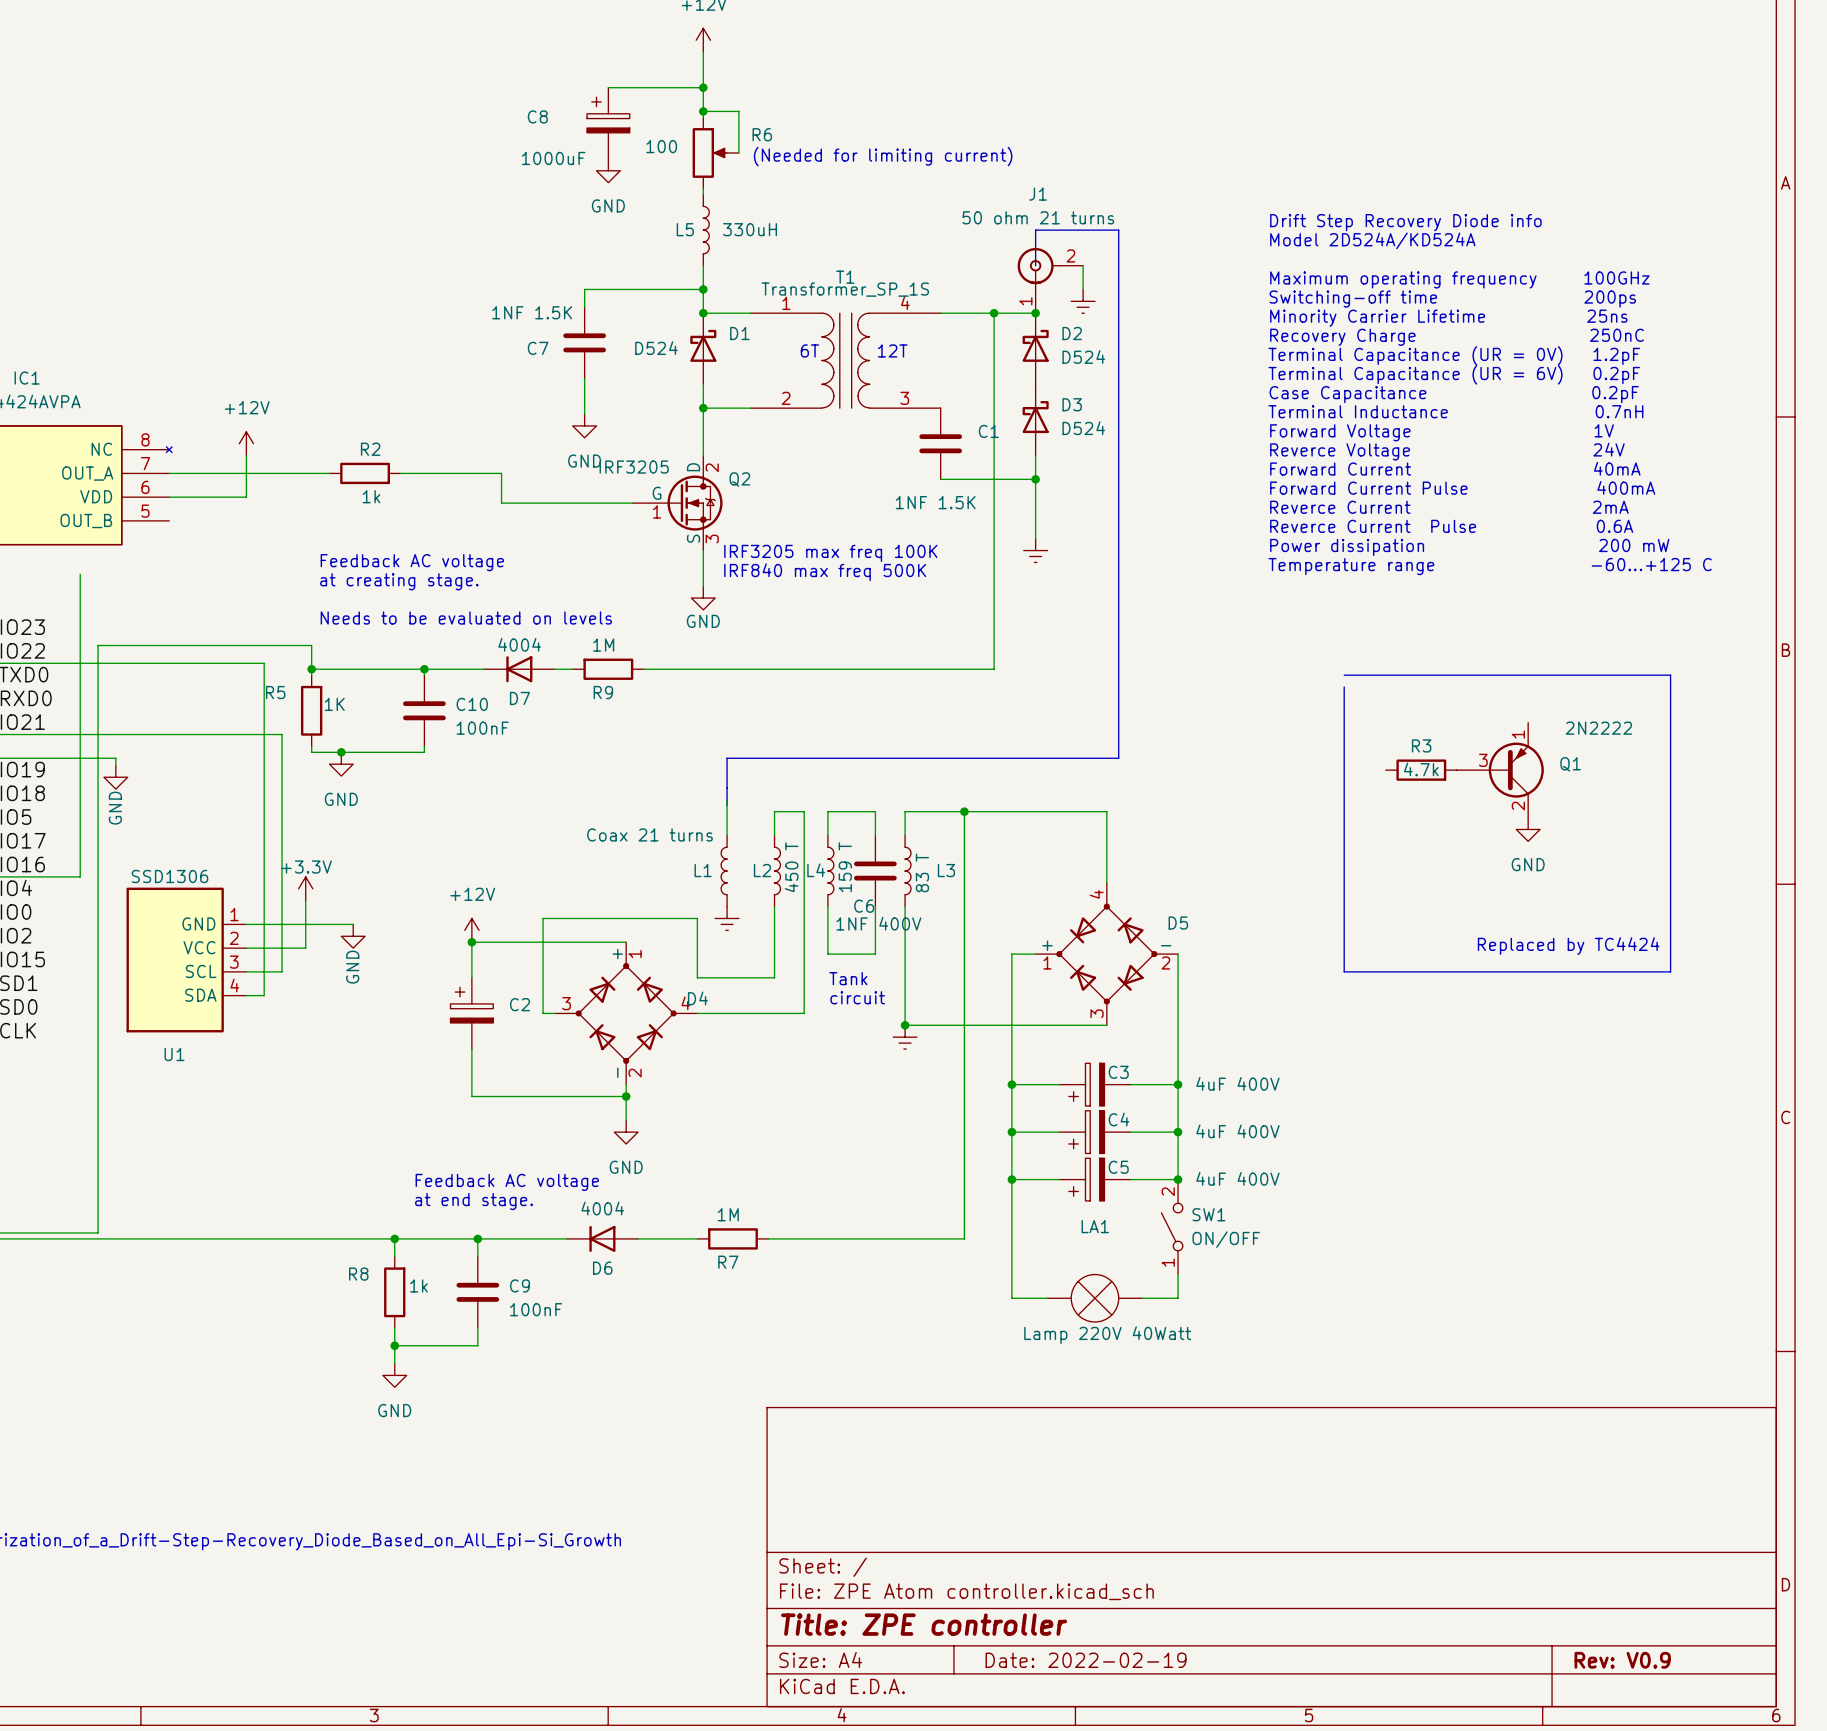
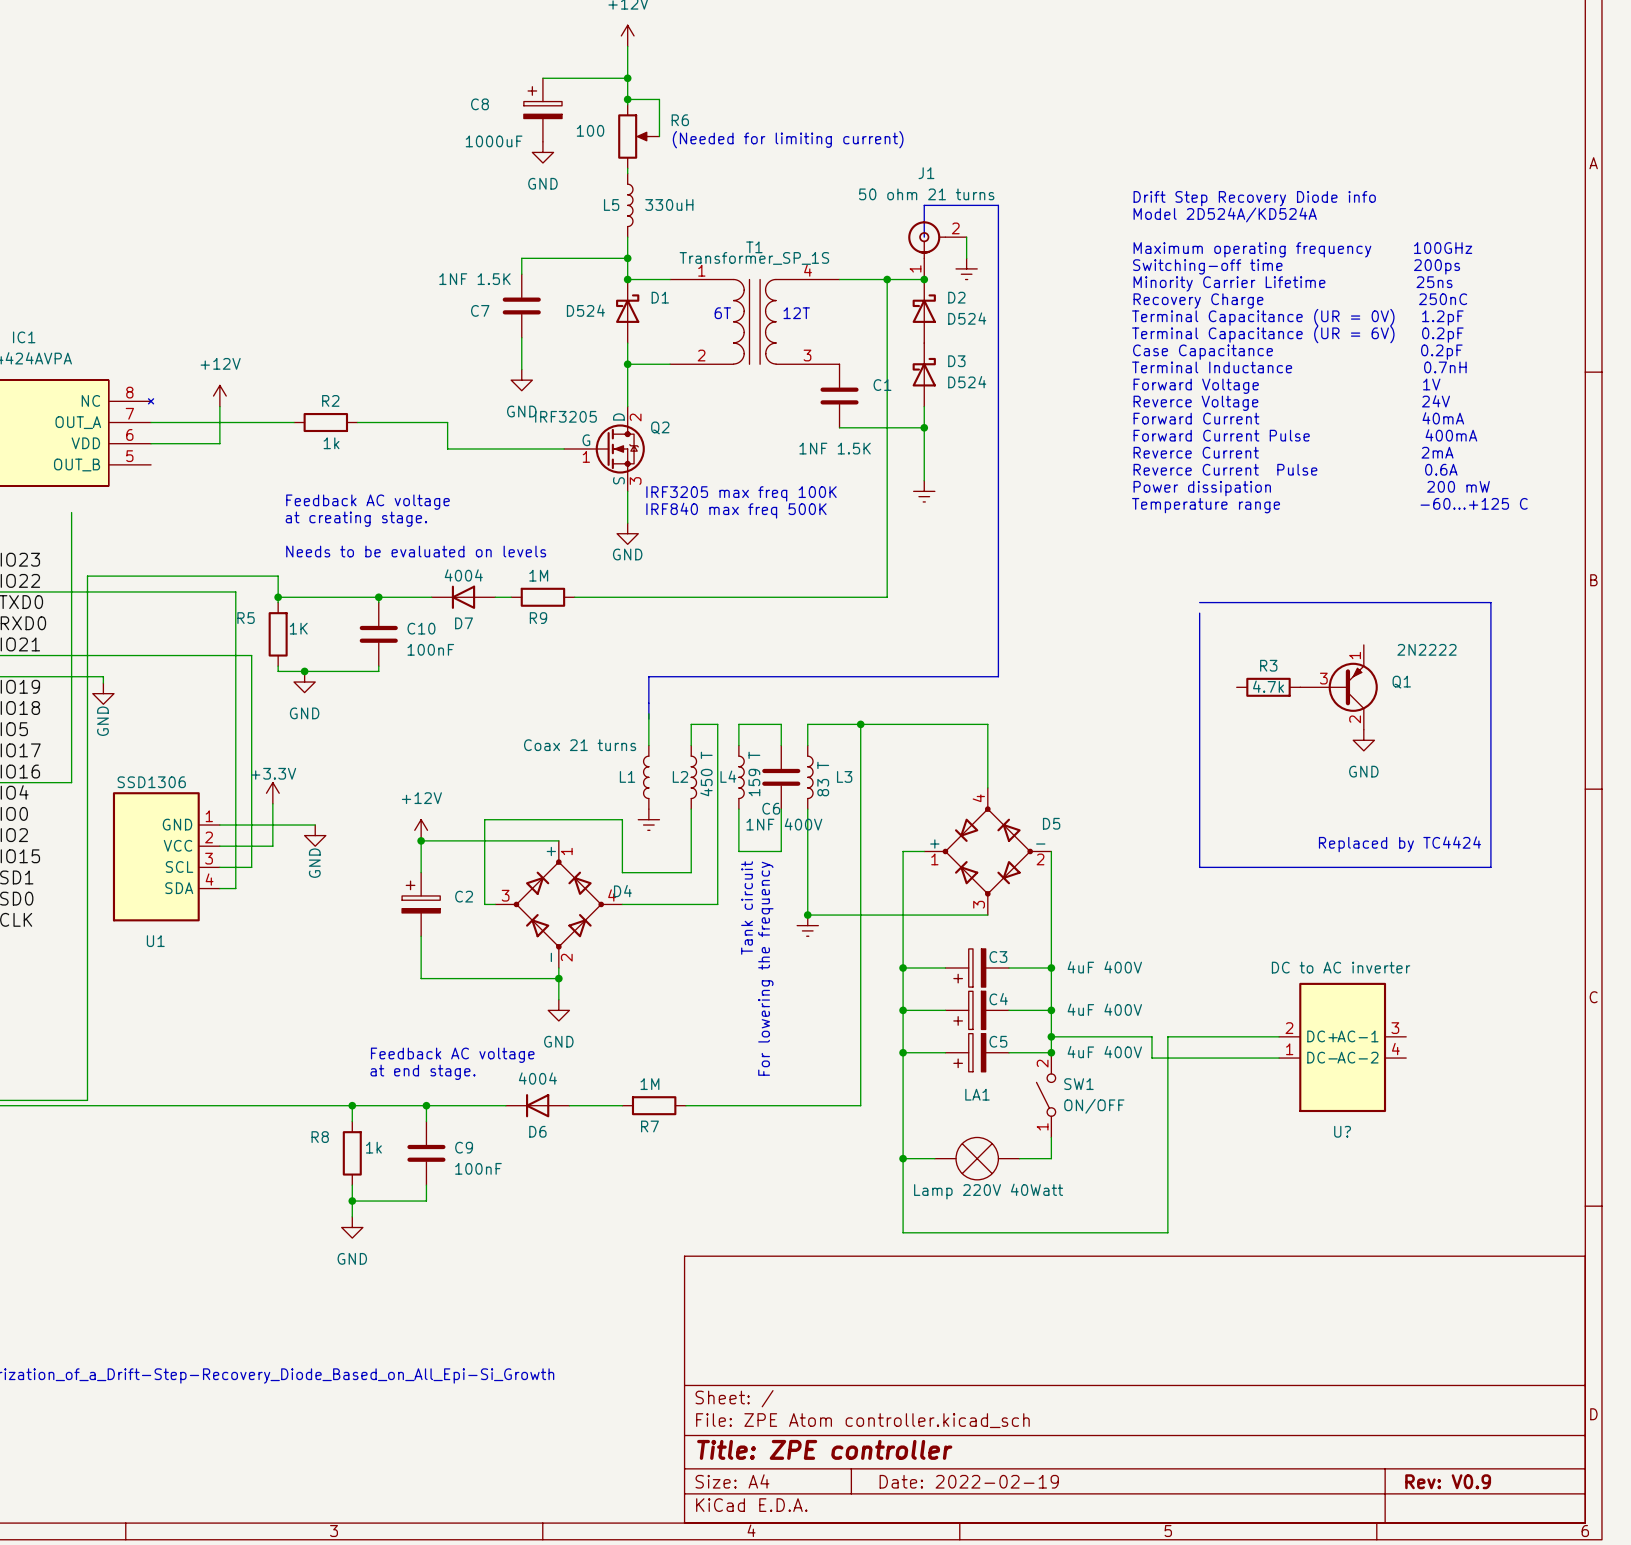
text: Tank (848, 978) -> none
text: circuit (857, 997) -> Tank circuit (747, 907)
text: none -> For lowering the frequency (765, 968)
wire: none -> (1051, 1036) (1151, 1036) (1151, 1058) (1279, 1058)
junction: none -> (1051, 1036)
wire: none -> (1279, 1036) (1167, 1036) (1167, 1232) (903, 1232) (903, 1158)
U?: none -> DC to AC inverter (1342, 1047)
junction: none -> (903, 1158)

